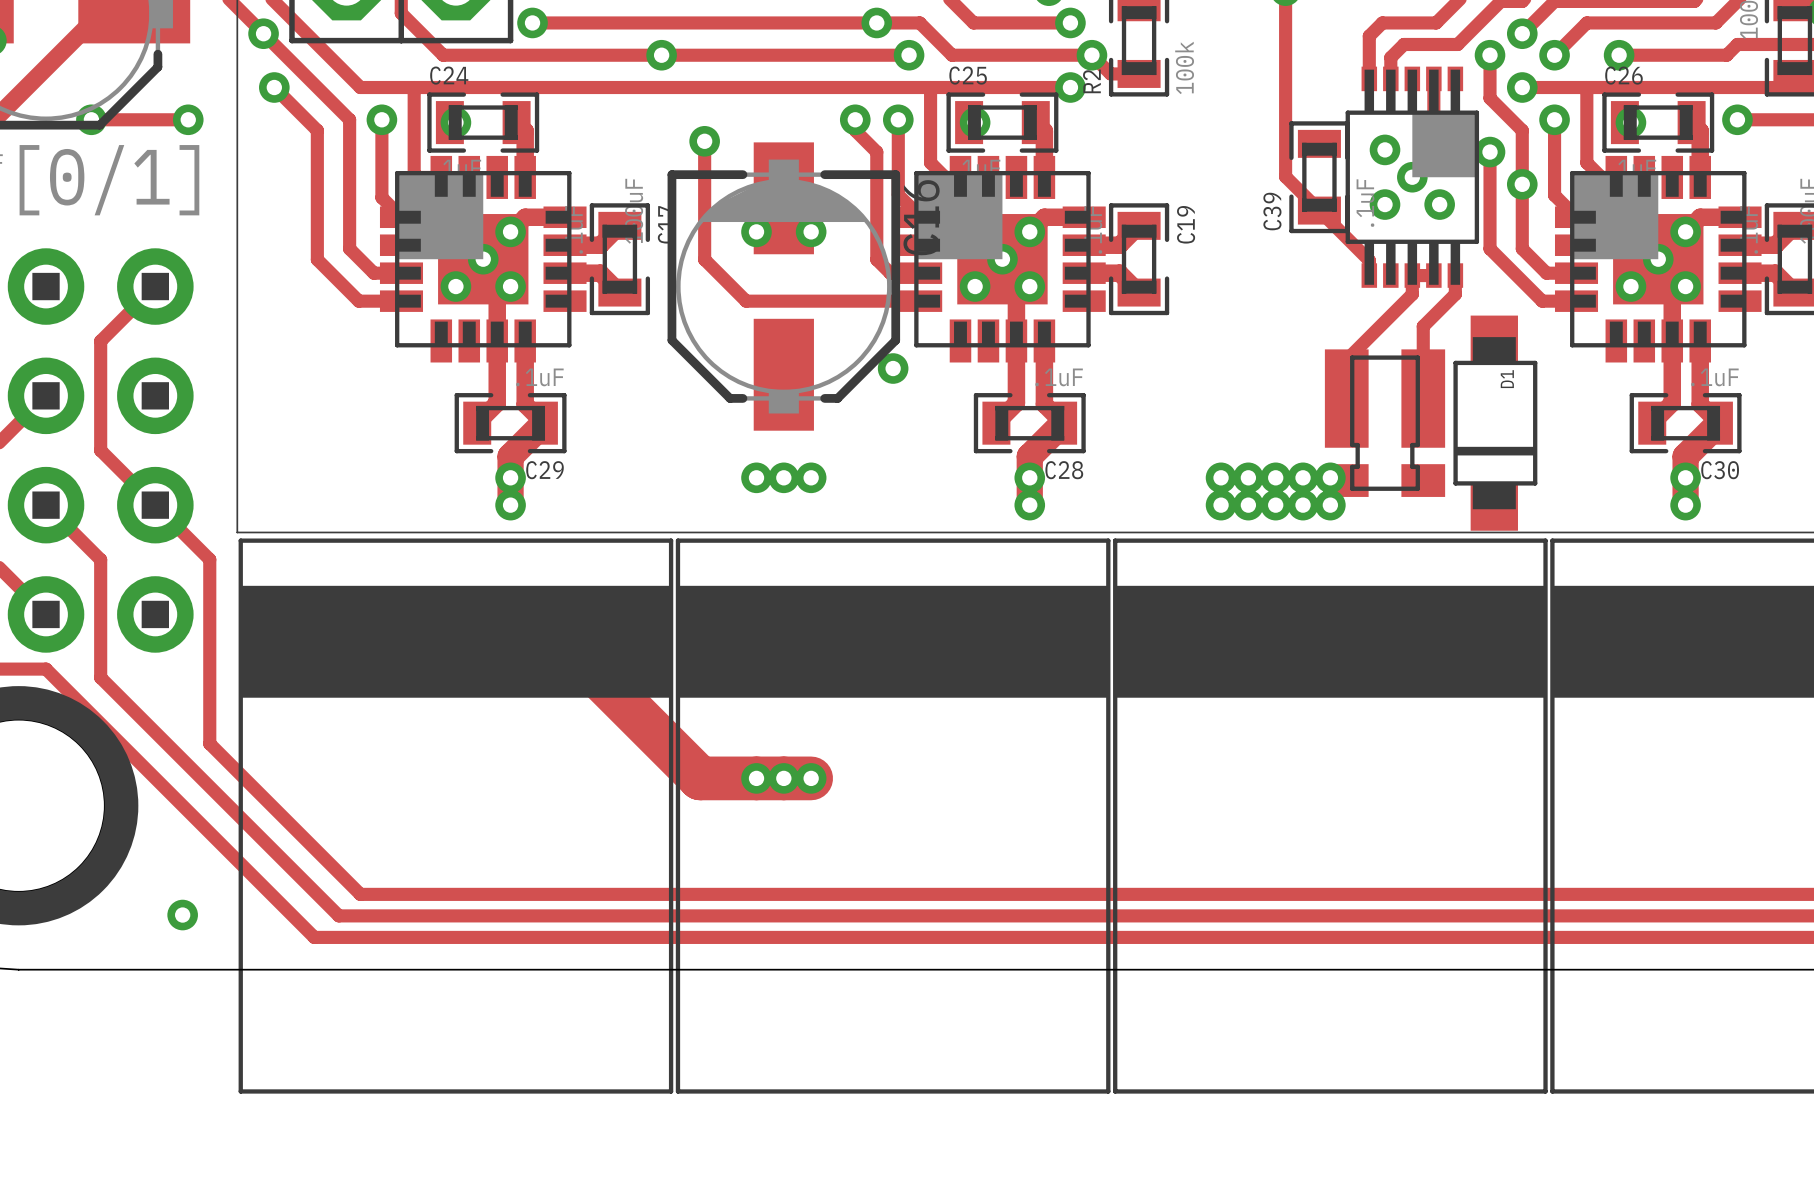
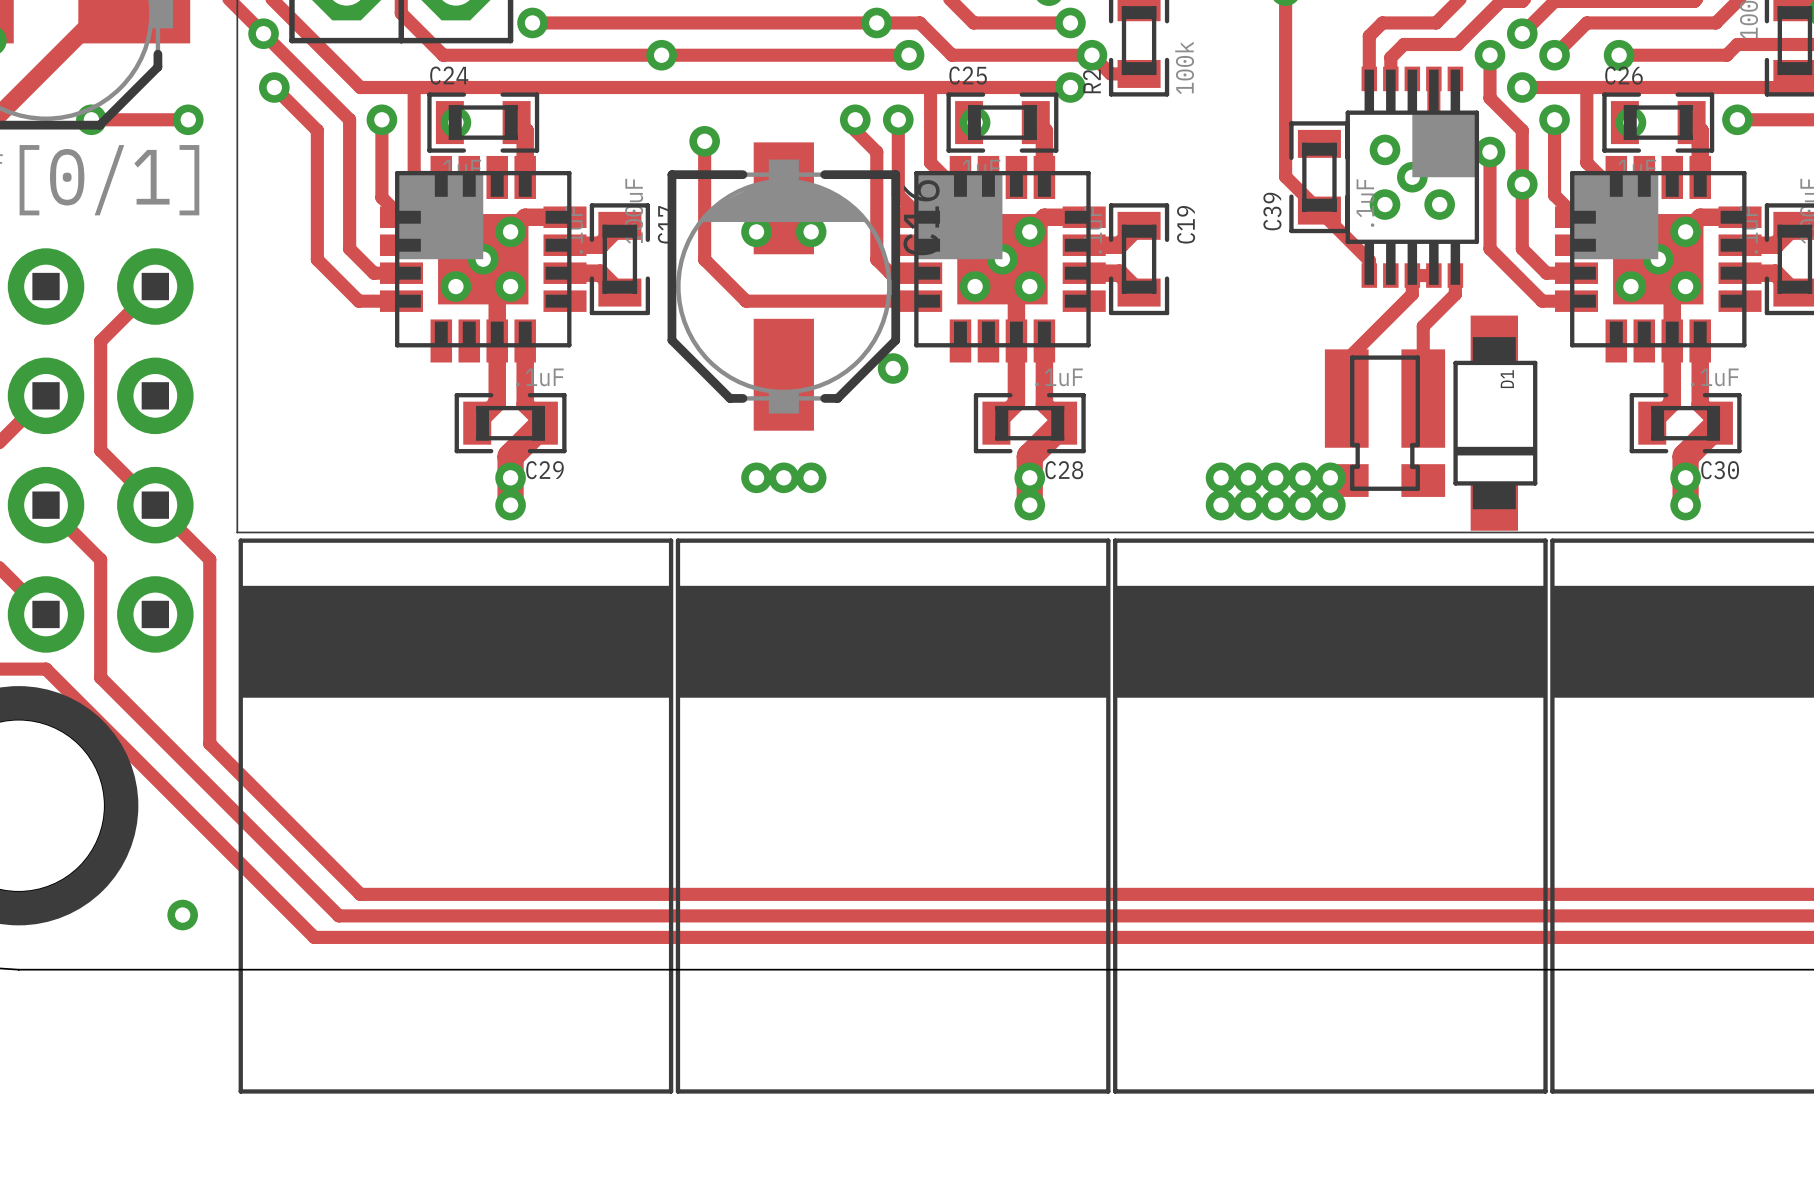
track: (563, 641) (700, 778) (811, 778) -> none
via: (756, 778) -> none
via: (783, 778) -> none
via: (811, 778) -> none

